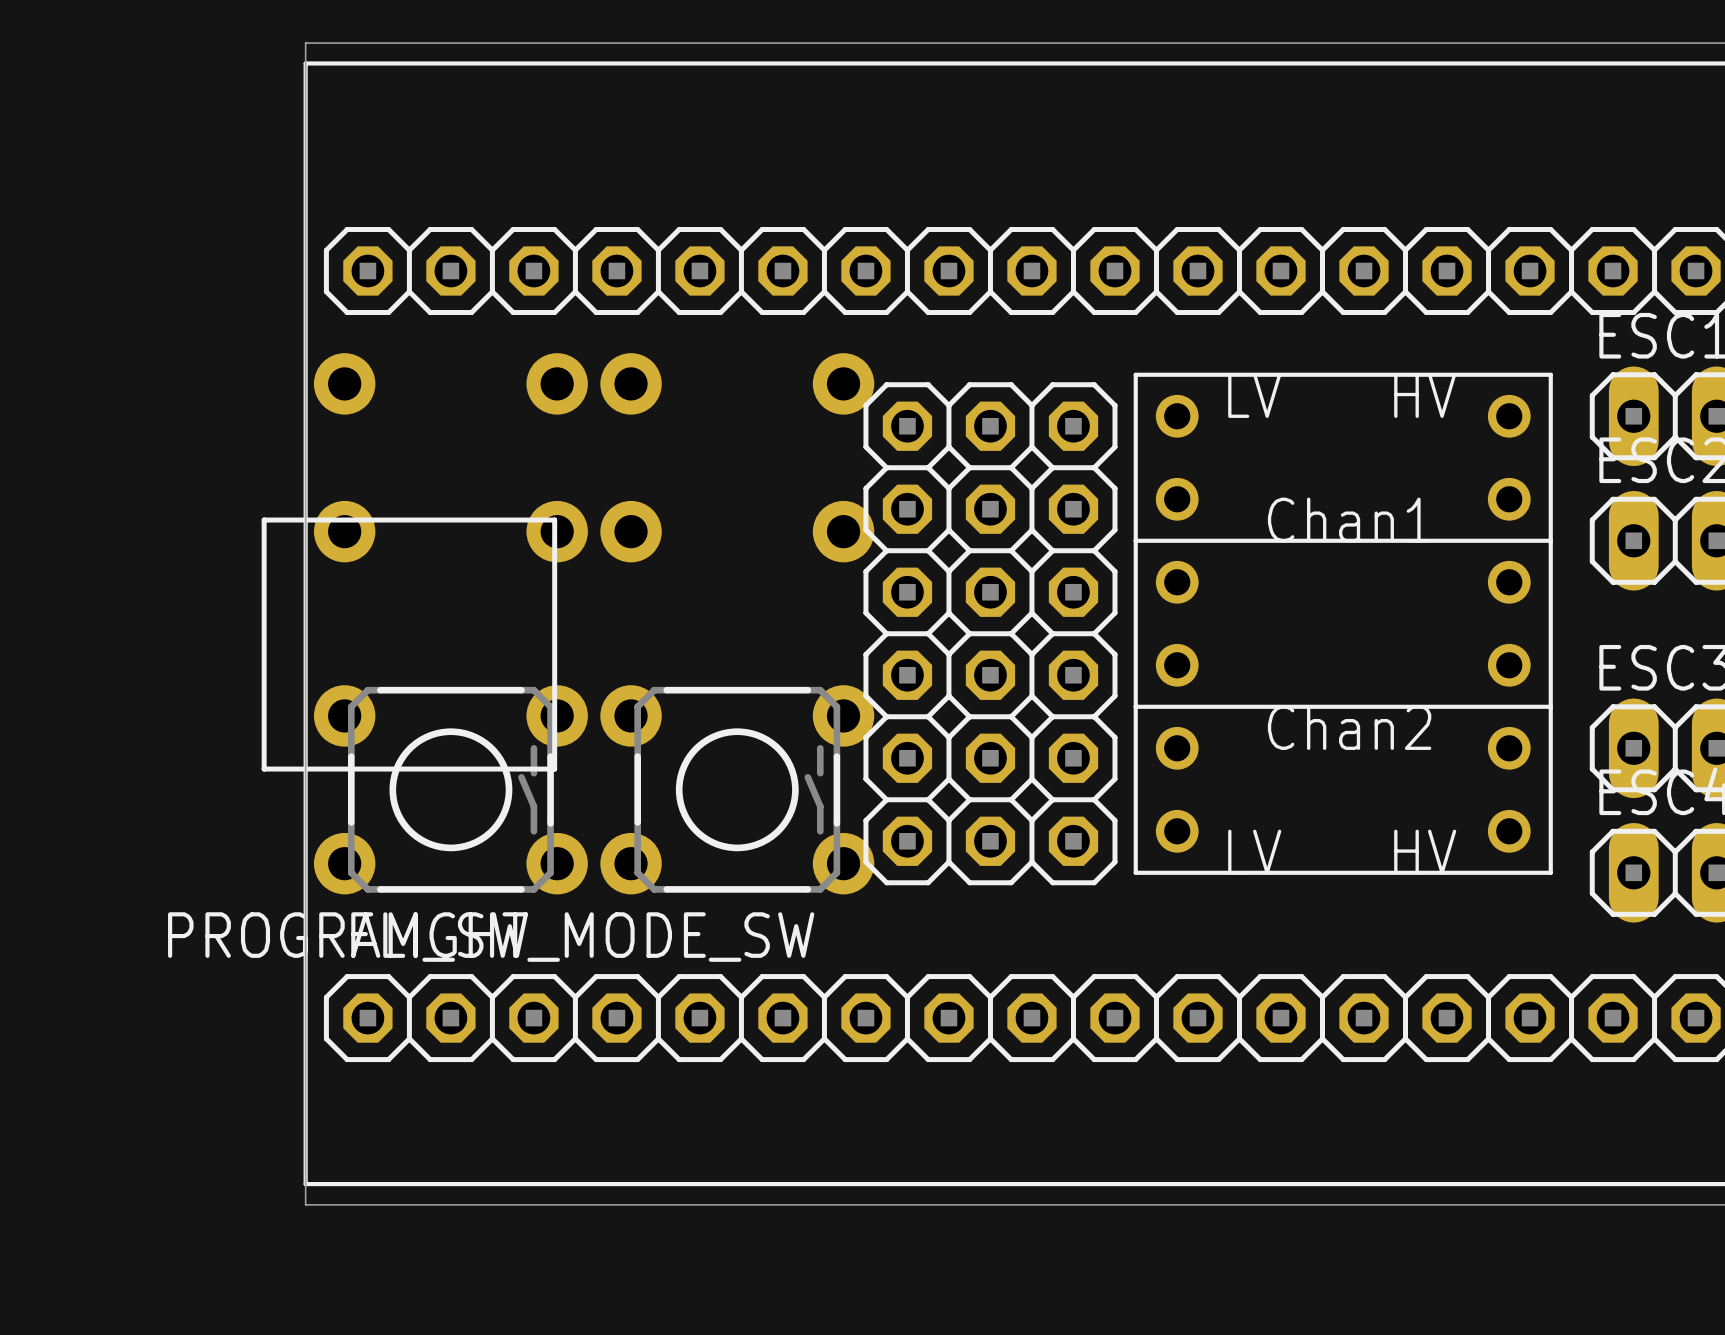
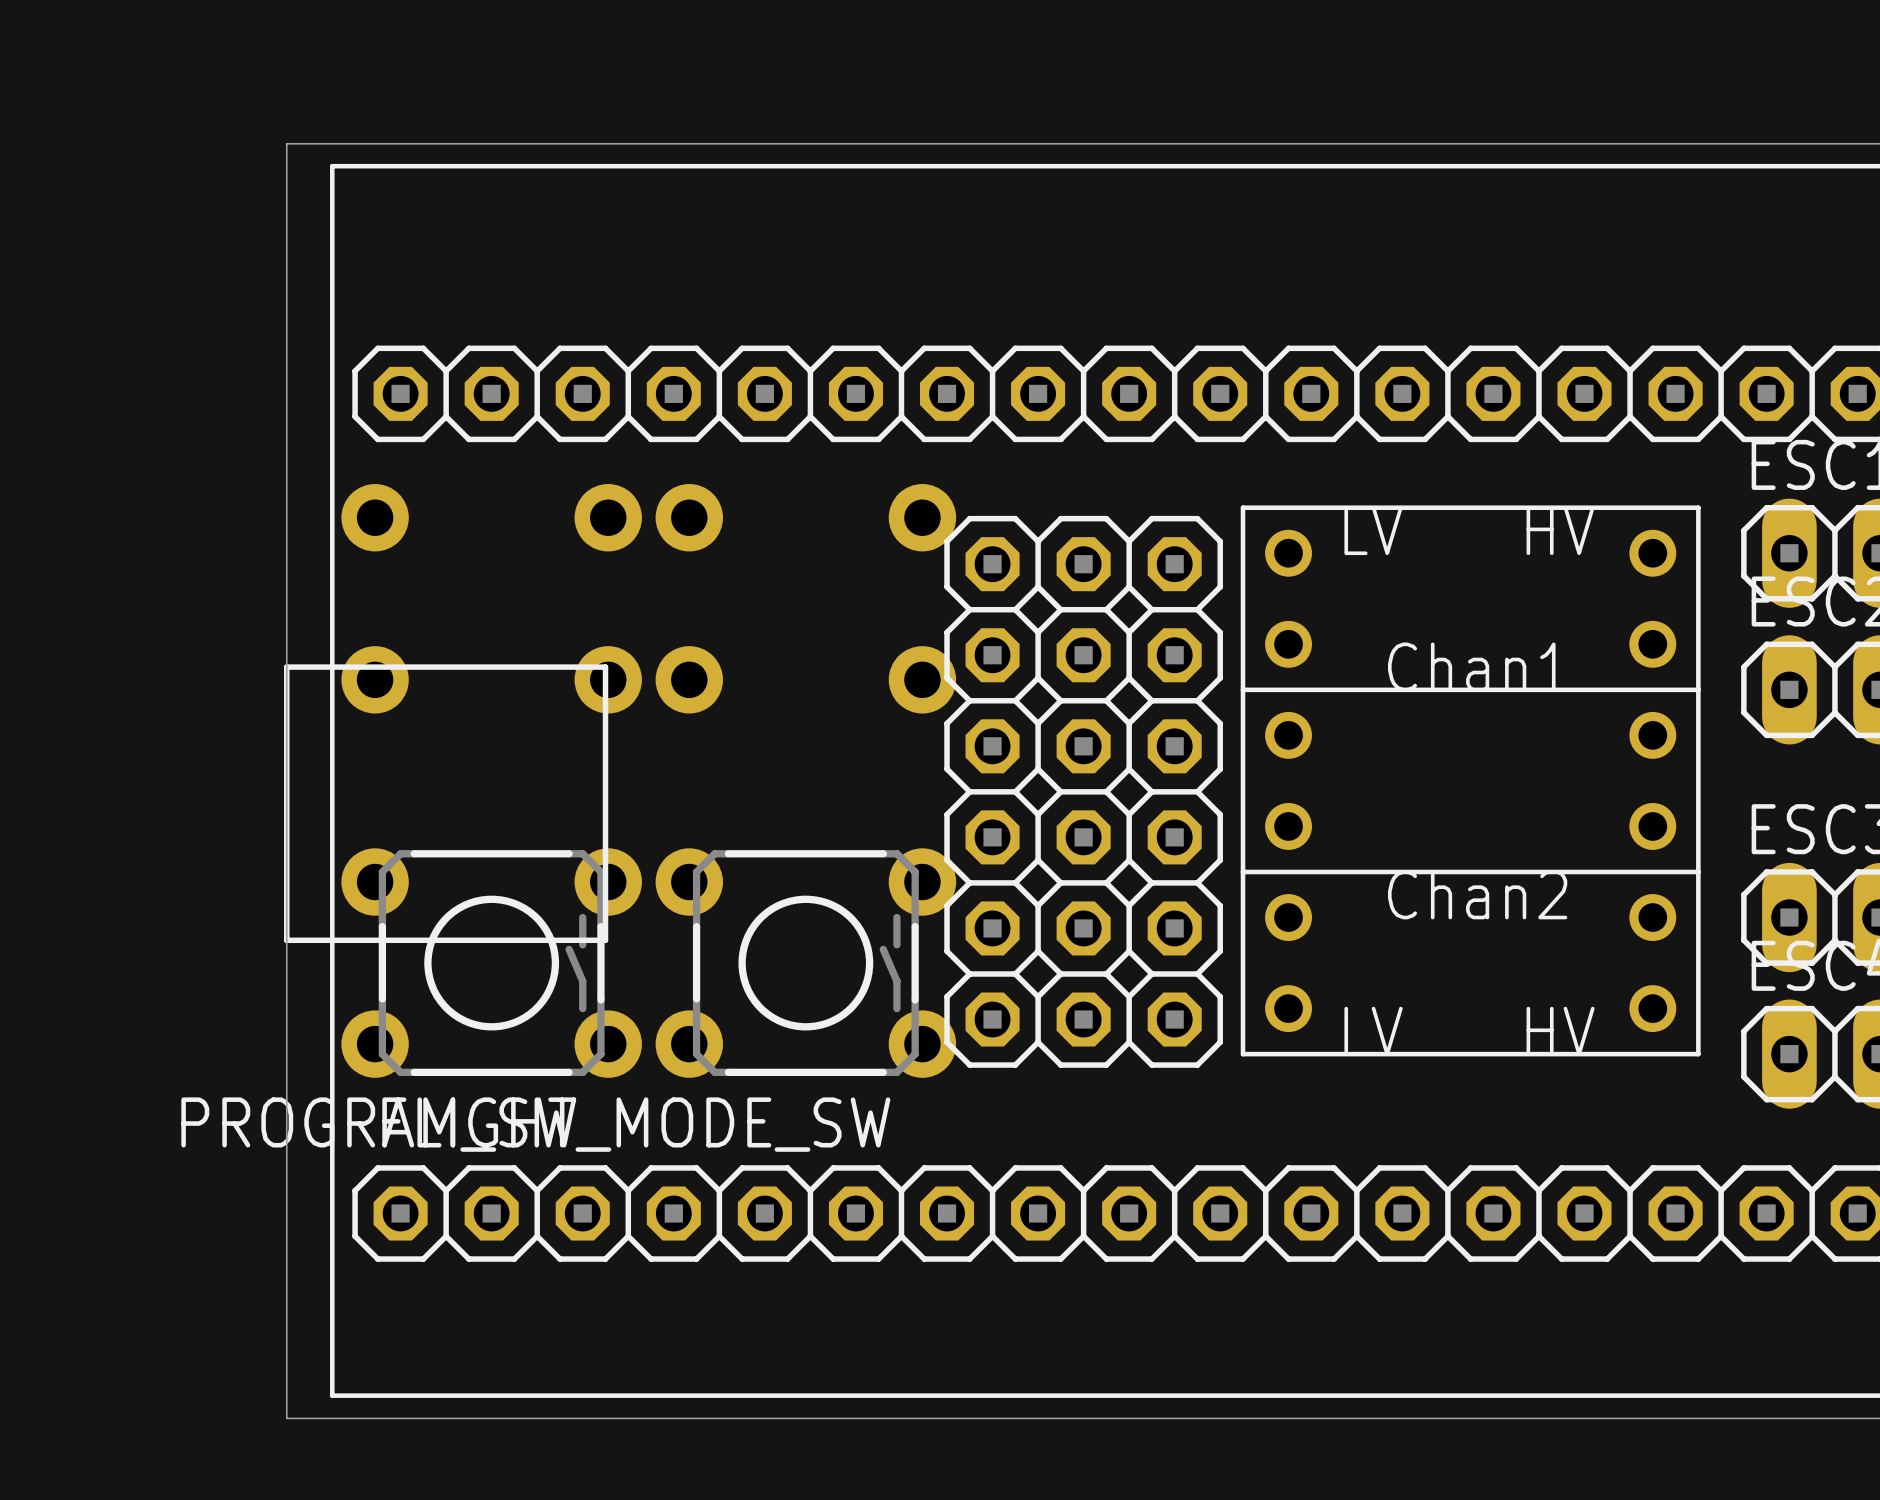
board edge: (305, 43) (305, 1204) -> (332, 143) (286, 143) (286, 1418) (332, 1418)

